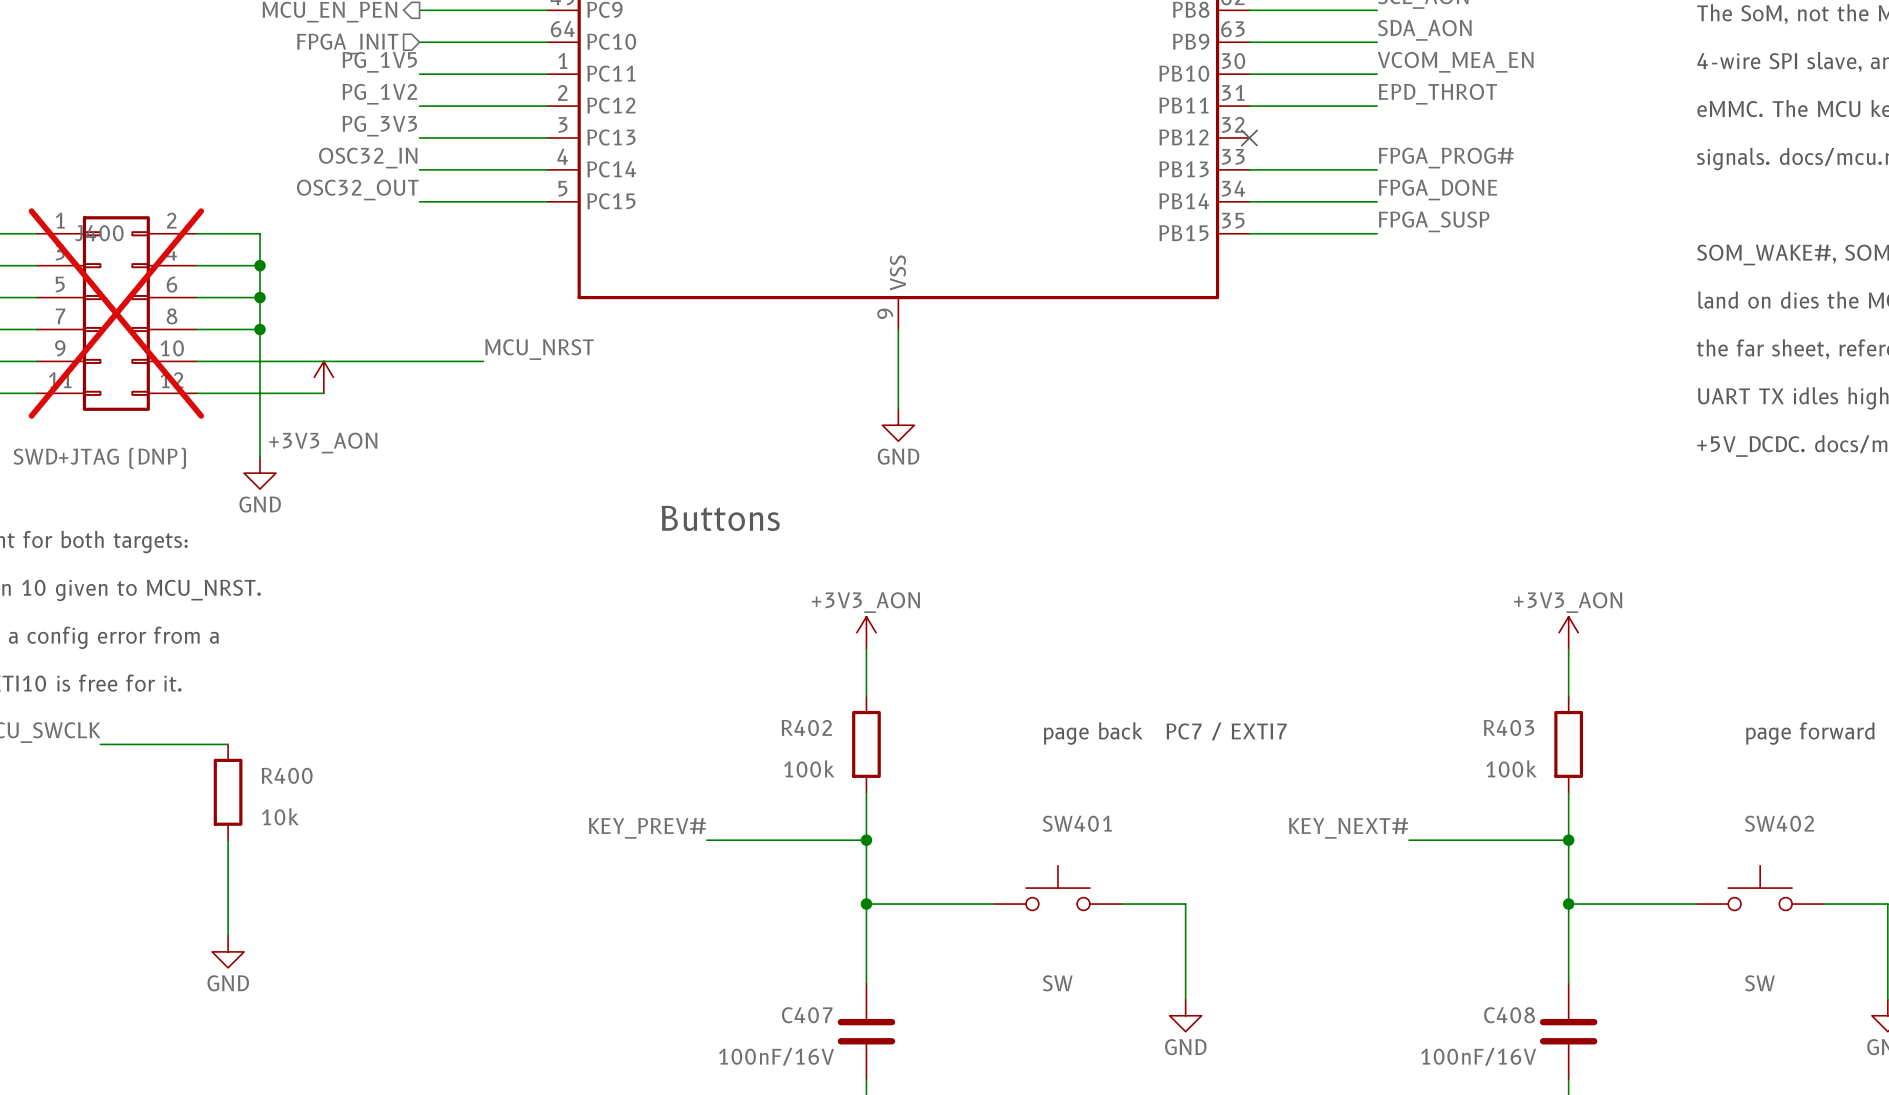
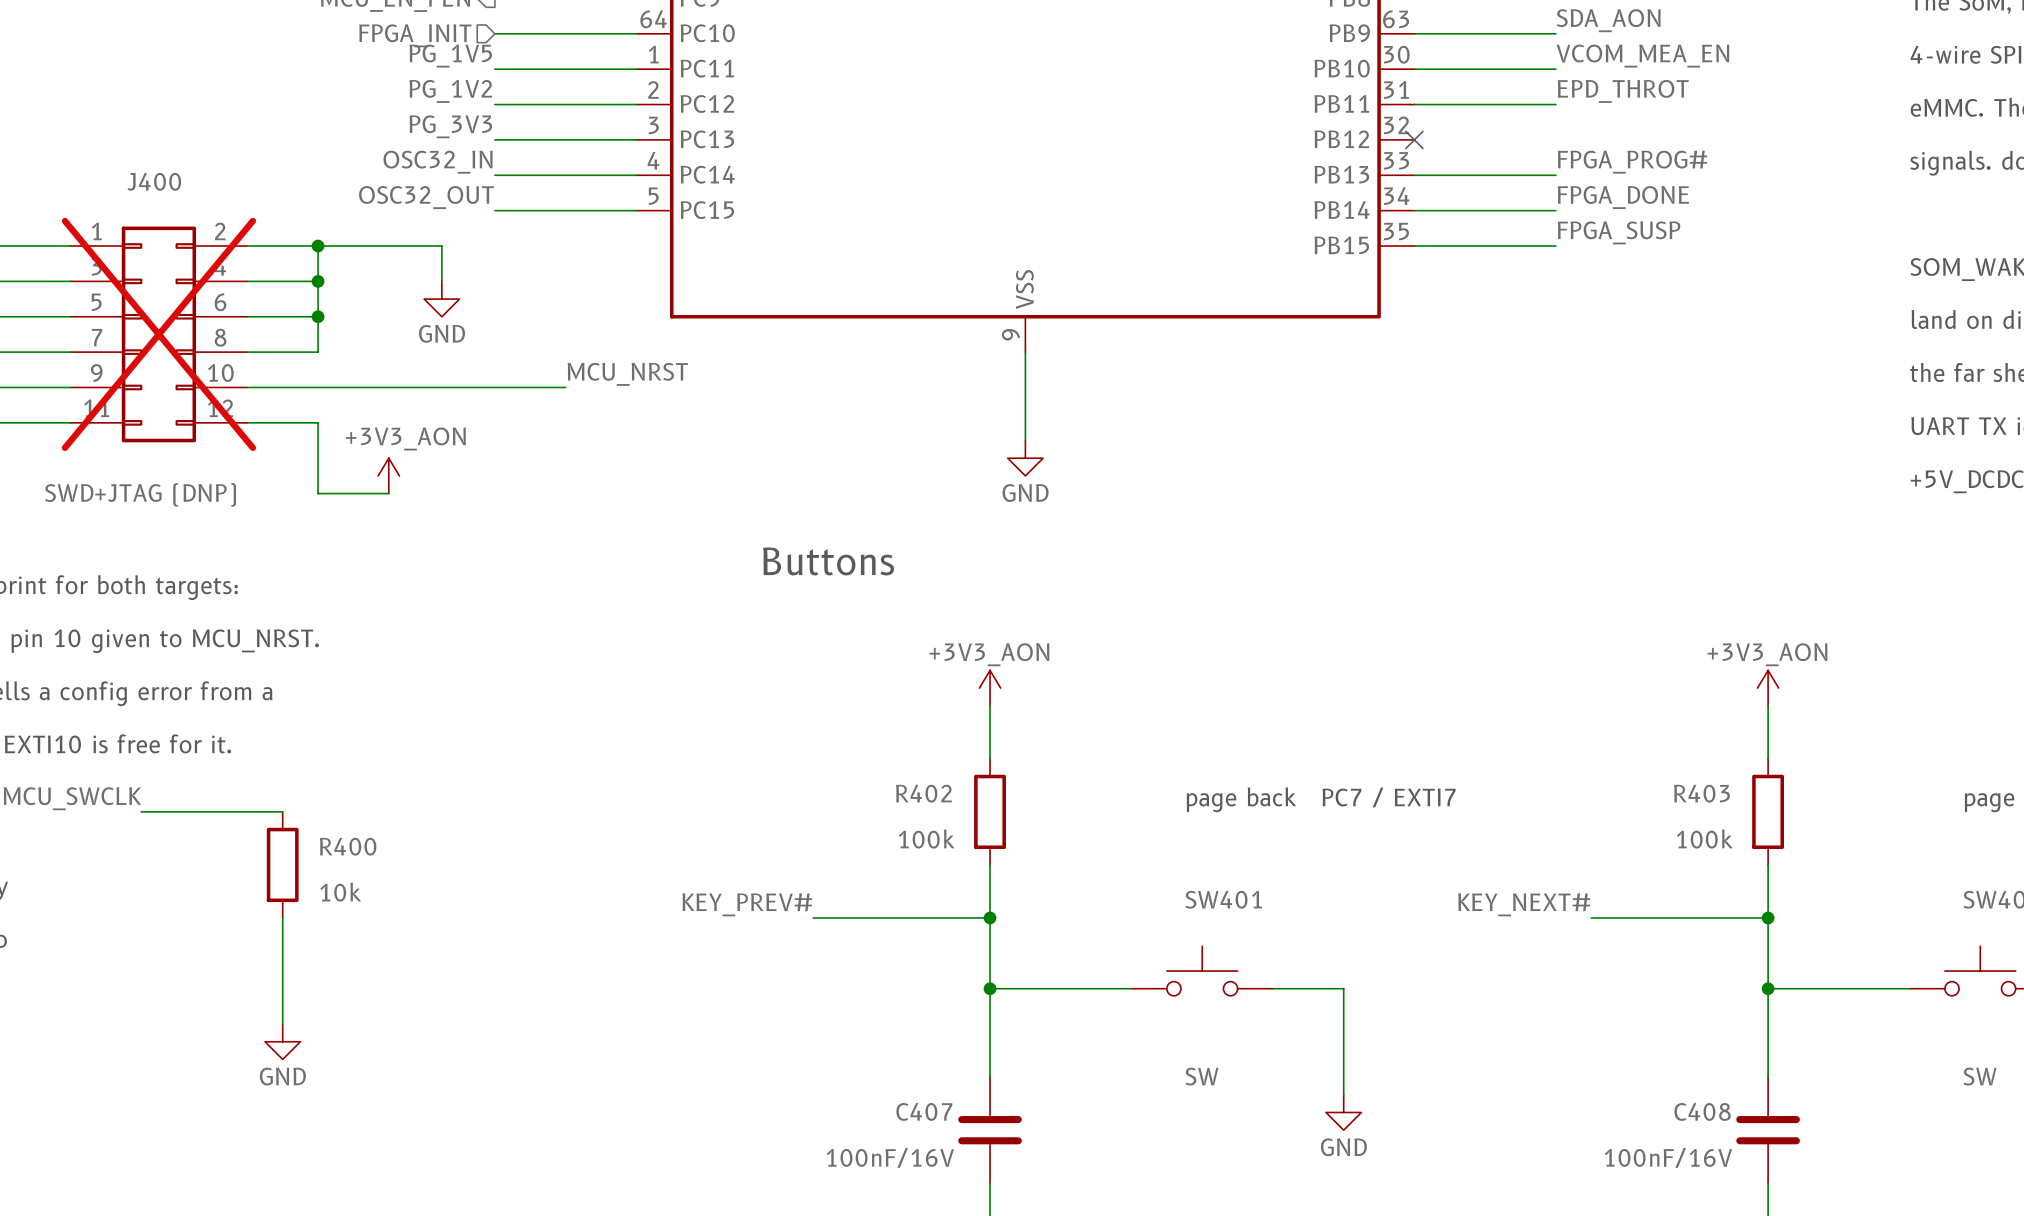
J400 name position: J400 (99, 233) -> J400 (154, 181)
wire: none -> (318, 246) (441, 246) (441, 281)
junction: none -> (318, 246)
wire: (260, 329) (260, 393) (323, 393) -> none
junction: (260, 329) -> none
power symbol position: +3V3_AON (323, 377) -> +3V3_AON (388, 475)
power symbol text position: +3V3_AON (323, 443) -> +3V3_AON (405, 438)
wire: none -> (318, 493) (388, 493)
power symbol position: GND (260, 473) -> GND (441, 299)

